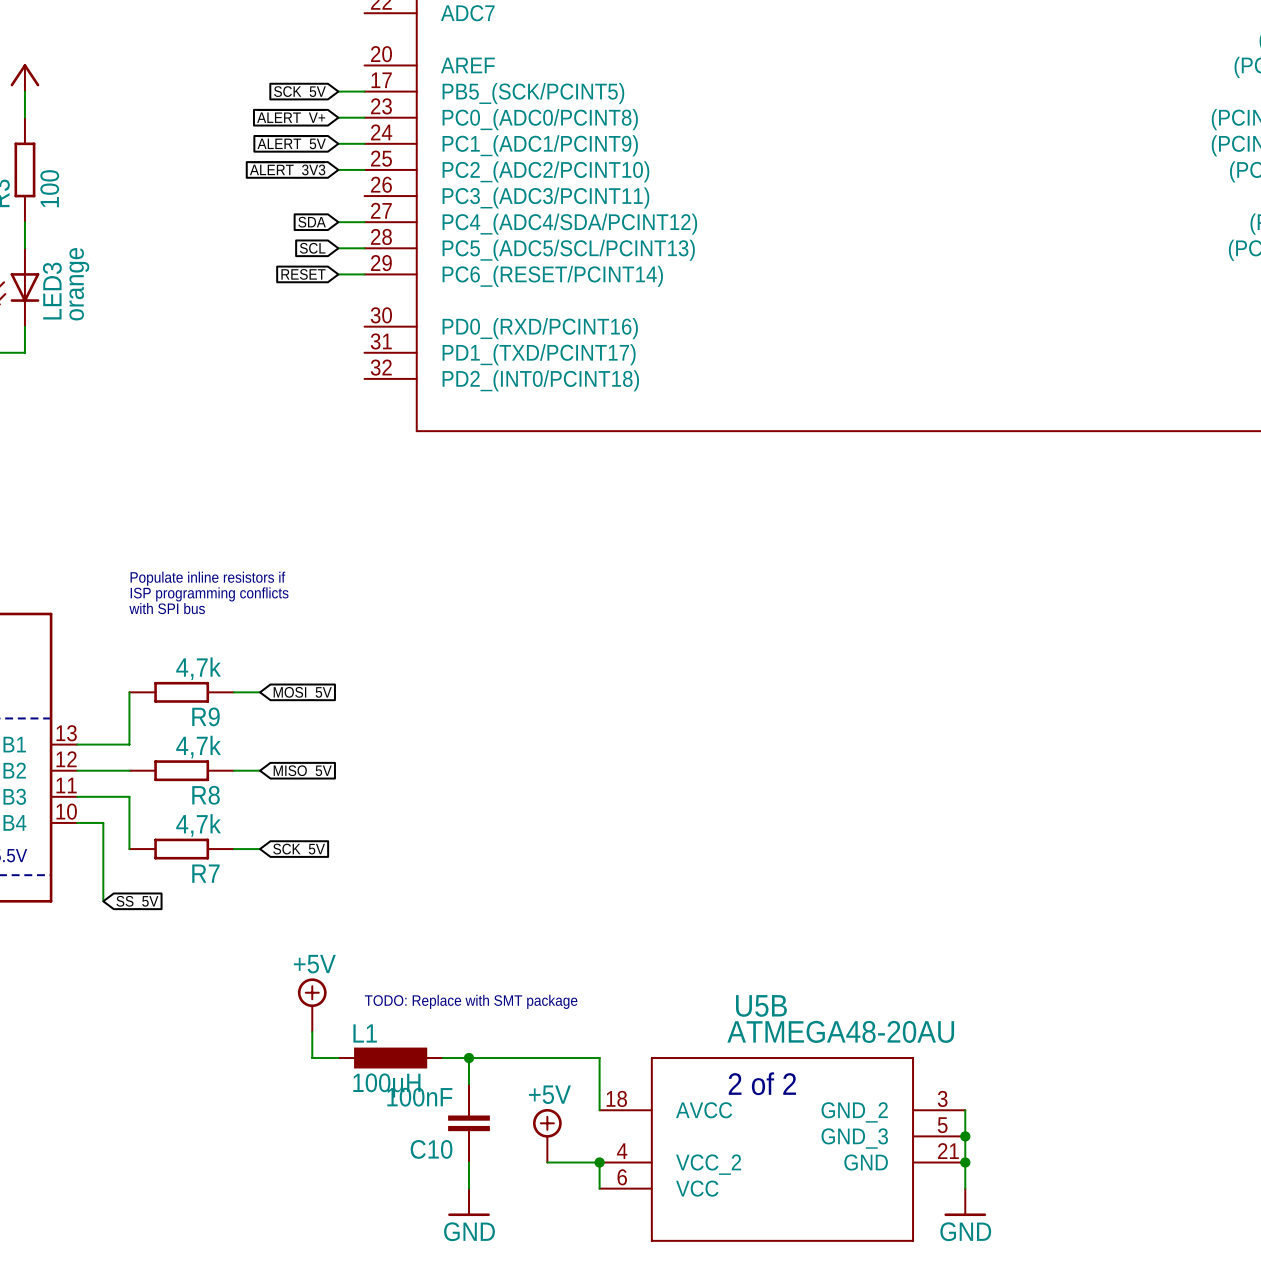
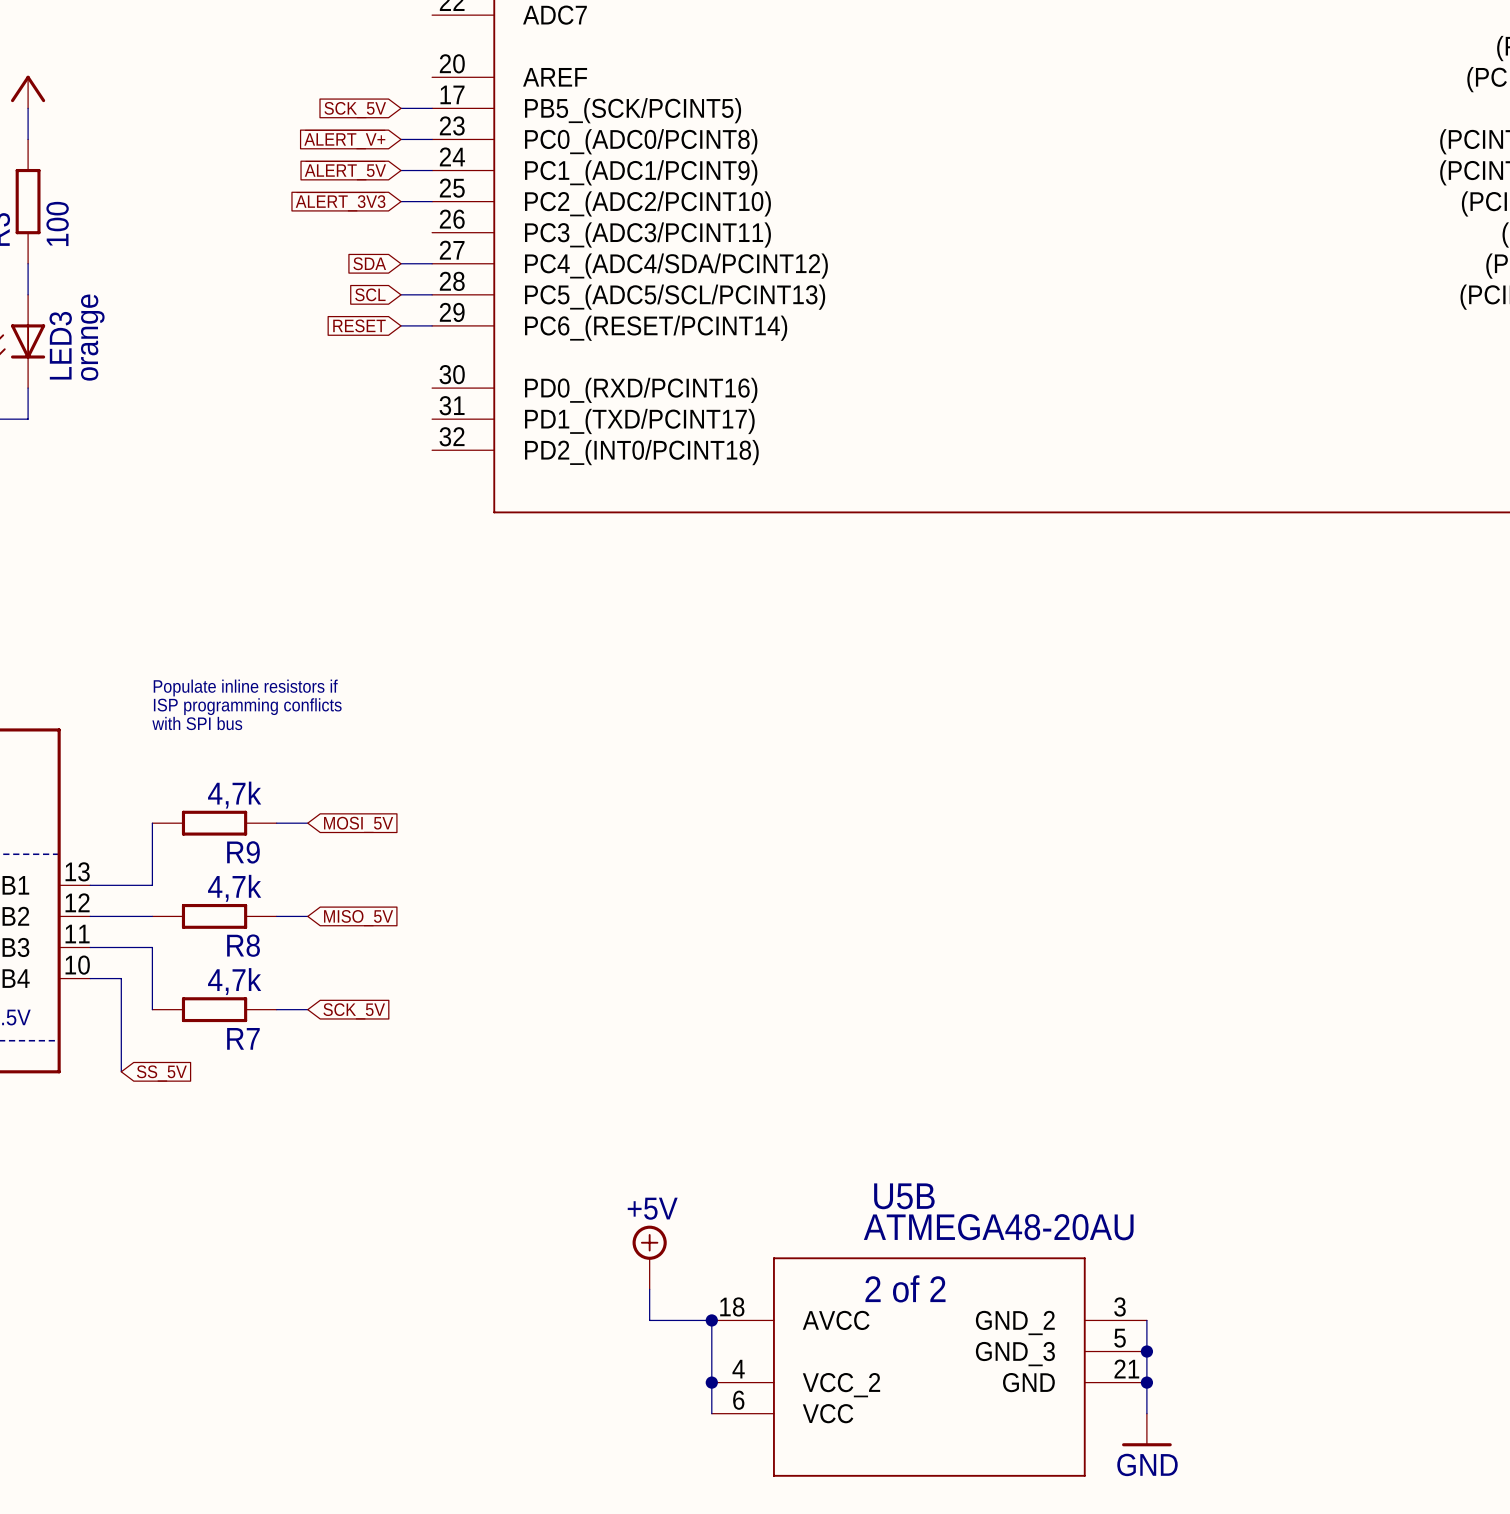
text: TODO: Replace with SMT package (471, 1001) -> none
power symbol: +5V (312, 1005) -> none
wire: (312, 1031) (312, 1058) (338, 1058) -> none
L1: 100µH (390, 1058) -> none
wire: (442, 1058) (599, 1058) (599, 1110) -> none
wire: (469, 1058) (469, 1084) -> none
junction: (469, 1058) -> none
junction: none -> (711, 1320)
C10: 100nF (469, 1123) -> none
power symbol position: +5V (547, 1135) -> +5V (649, 1257)
wire: (469, 1162) (469, 1188) -> none
wire: (547, 1162) (599, 1162) -> (649, 1289) (649, 1320) (711, 1320) (711, 1382)
power symbol: GND (469, 1202) -> none

